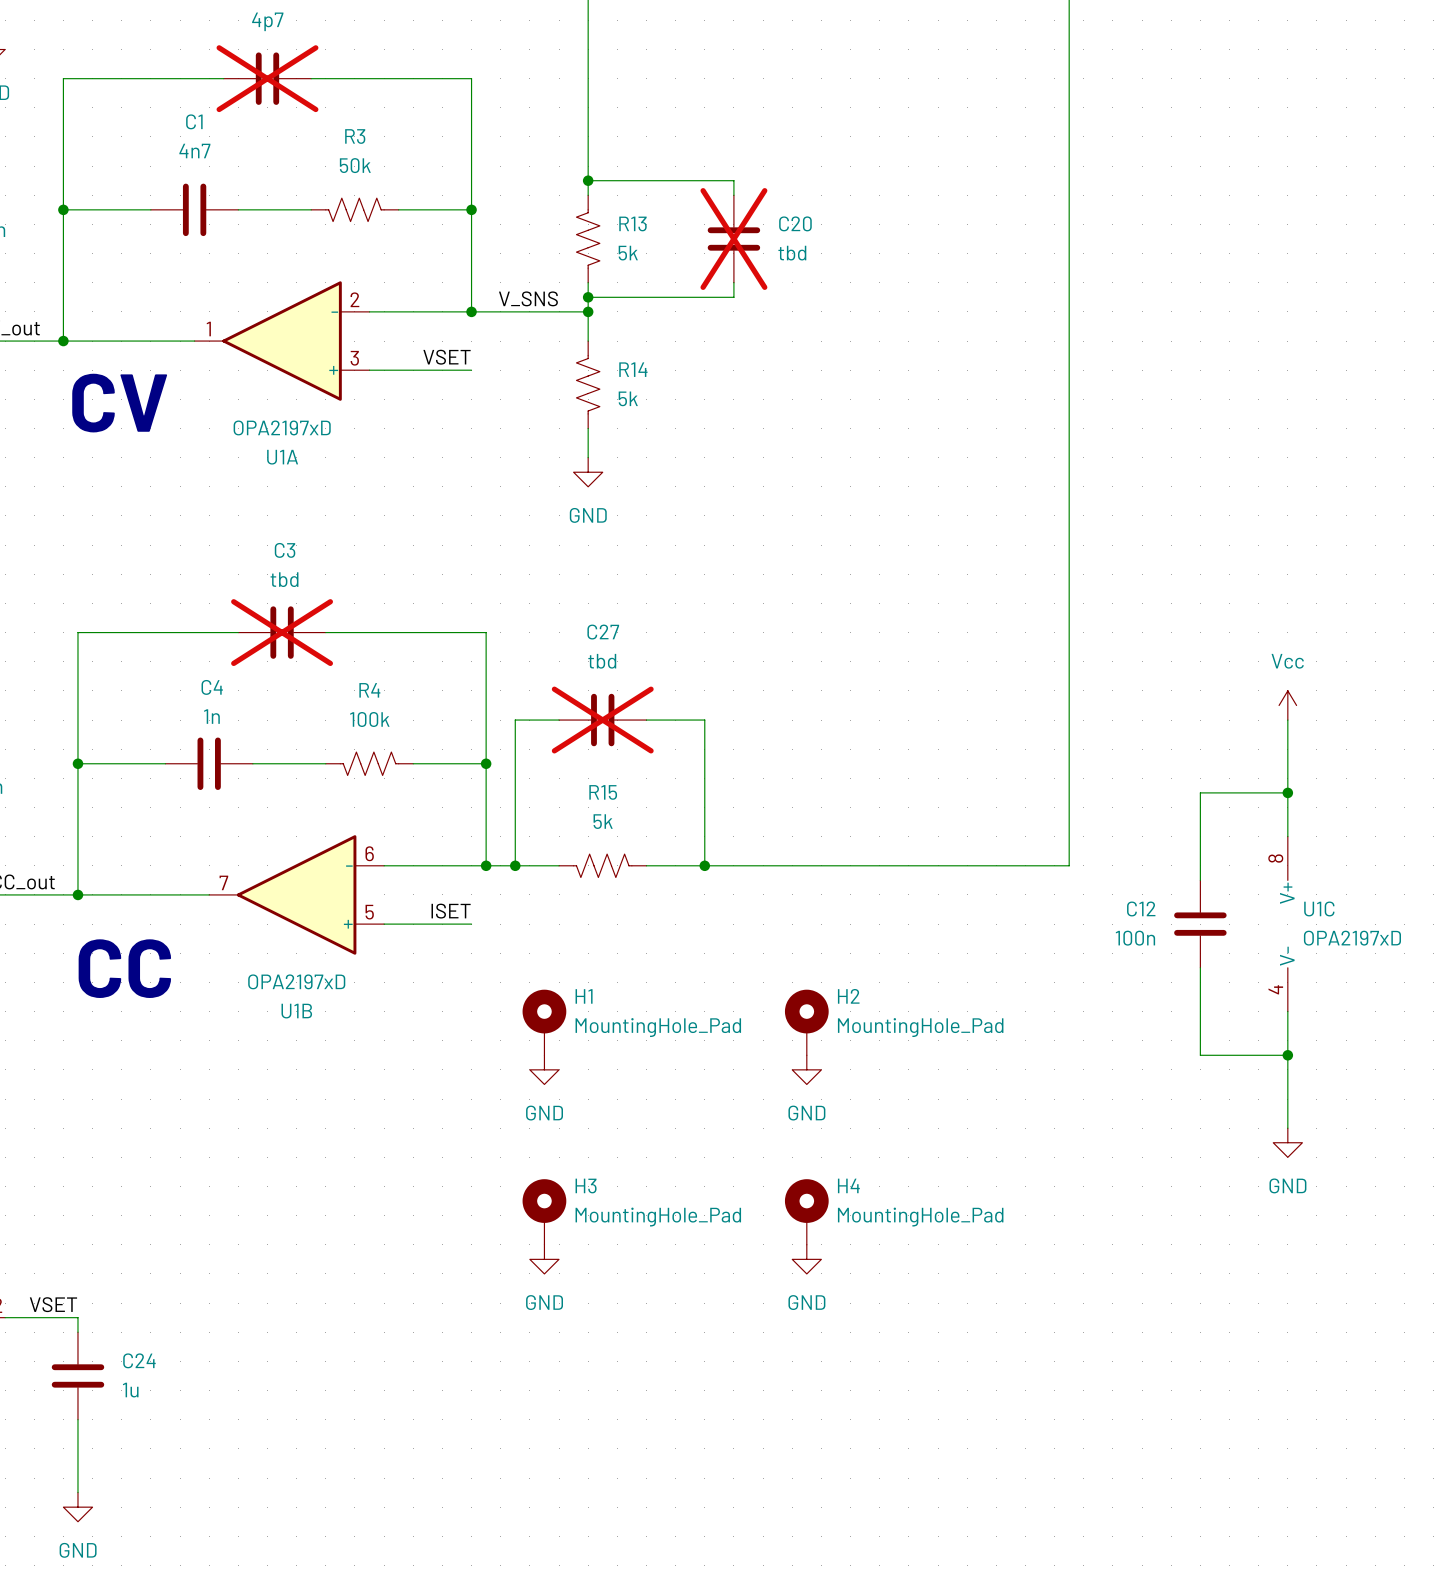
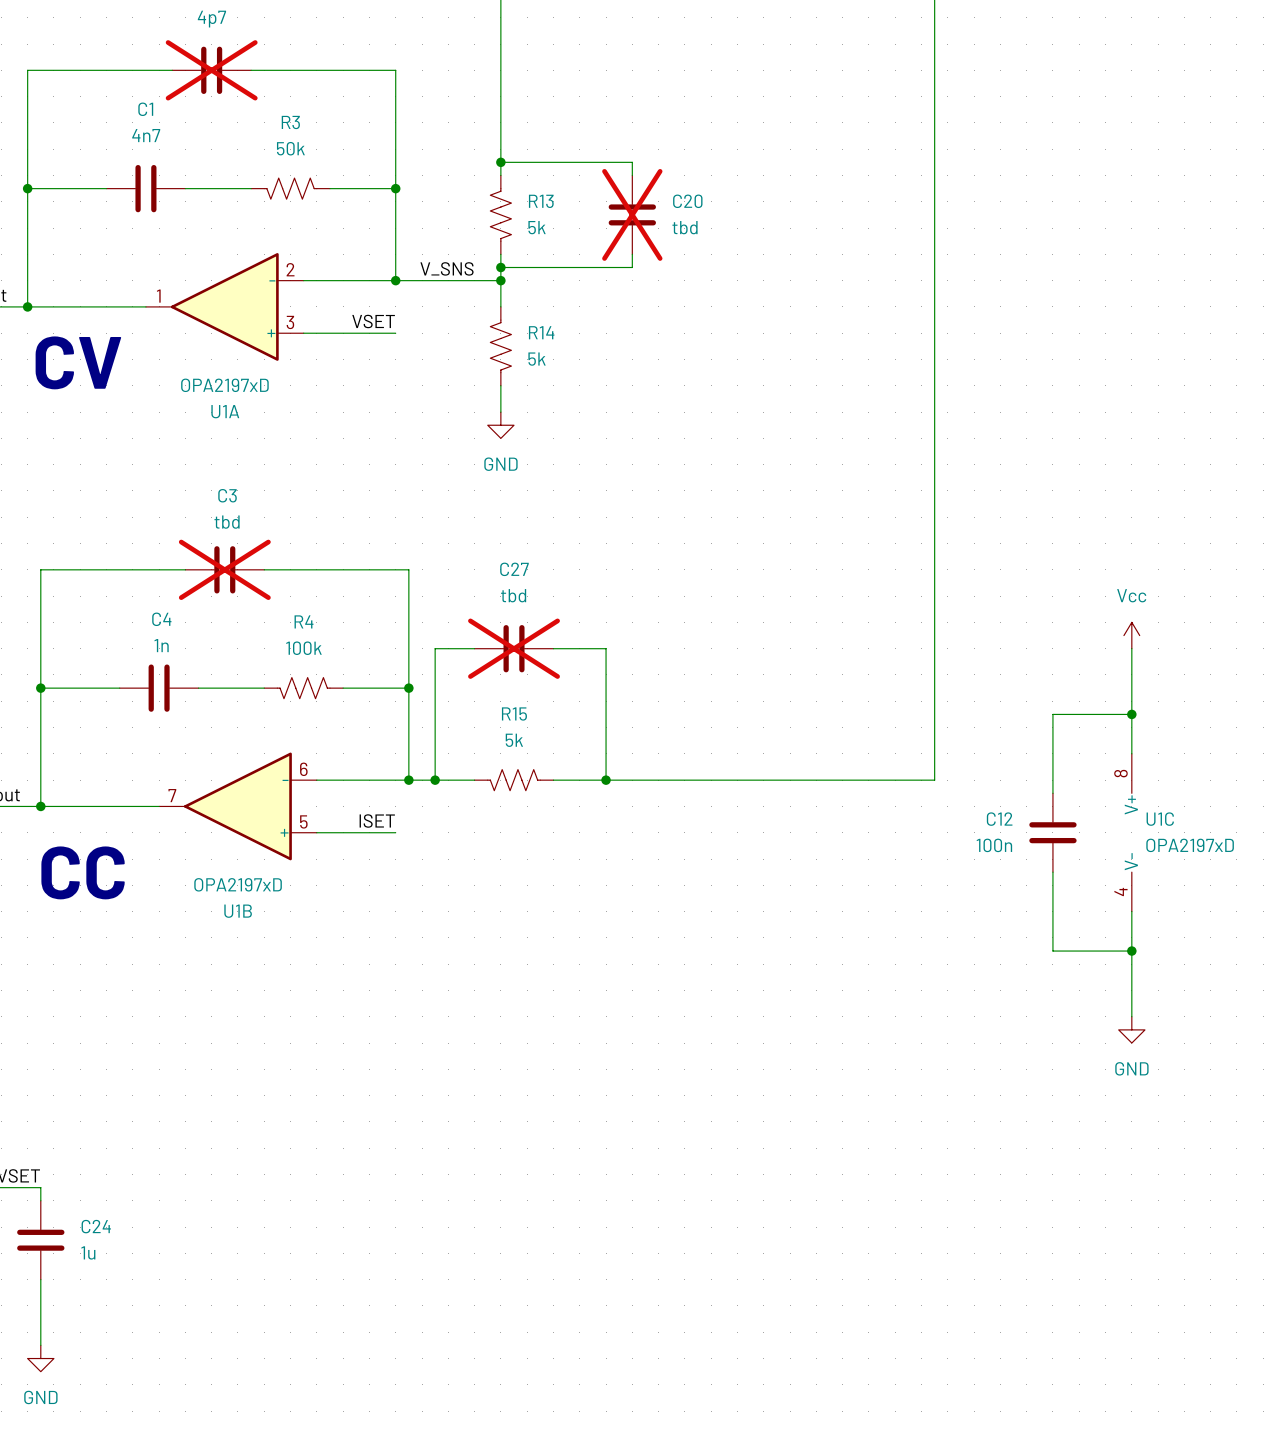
H1: MountingHole_Pad (544, 1022) -> none
H2: MountingHole_Pad (806, 1022) -> none
power symbol: GND (544, 1069) -> none
power symbol: GND (806, 1069) -> none
H3: MountingHole_Pad (544, 1211) -> none
H4: MountingHole_Pad (806, 1211) -> none
power symbol: GND (544, 1259) -> none
power symbol: GND (806, 1259) -> none

